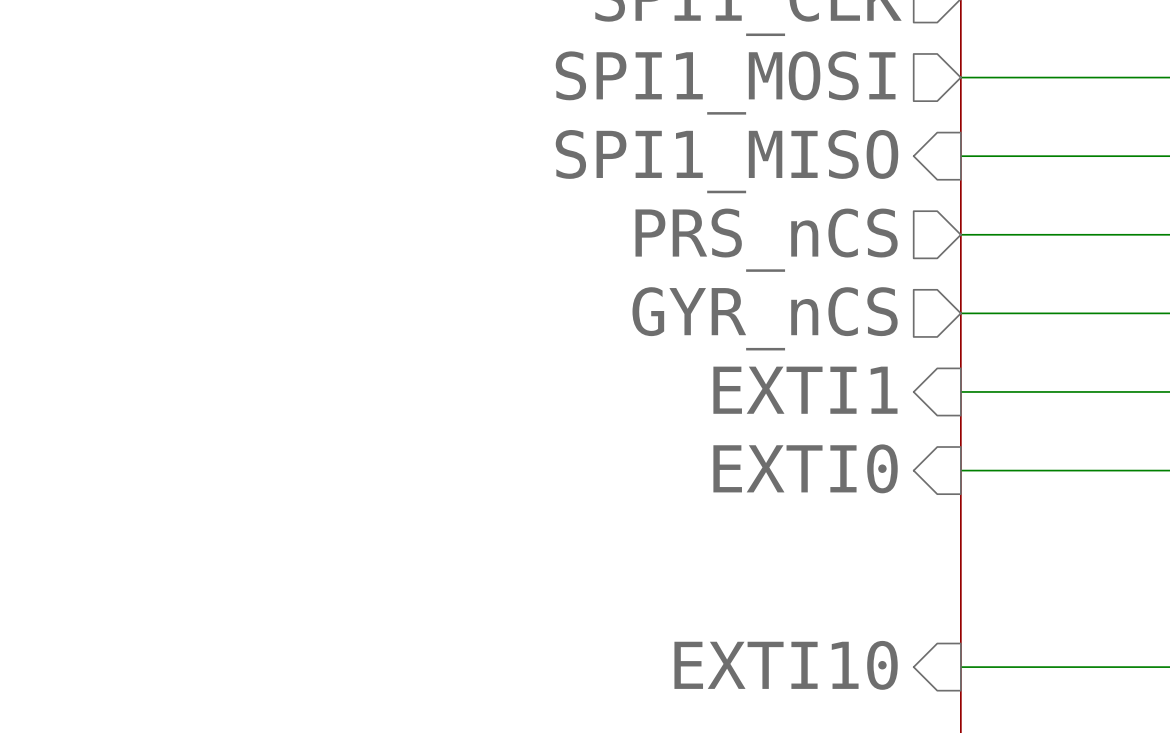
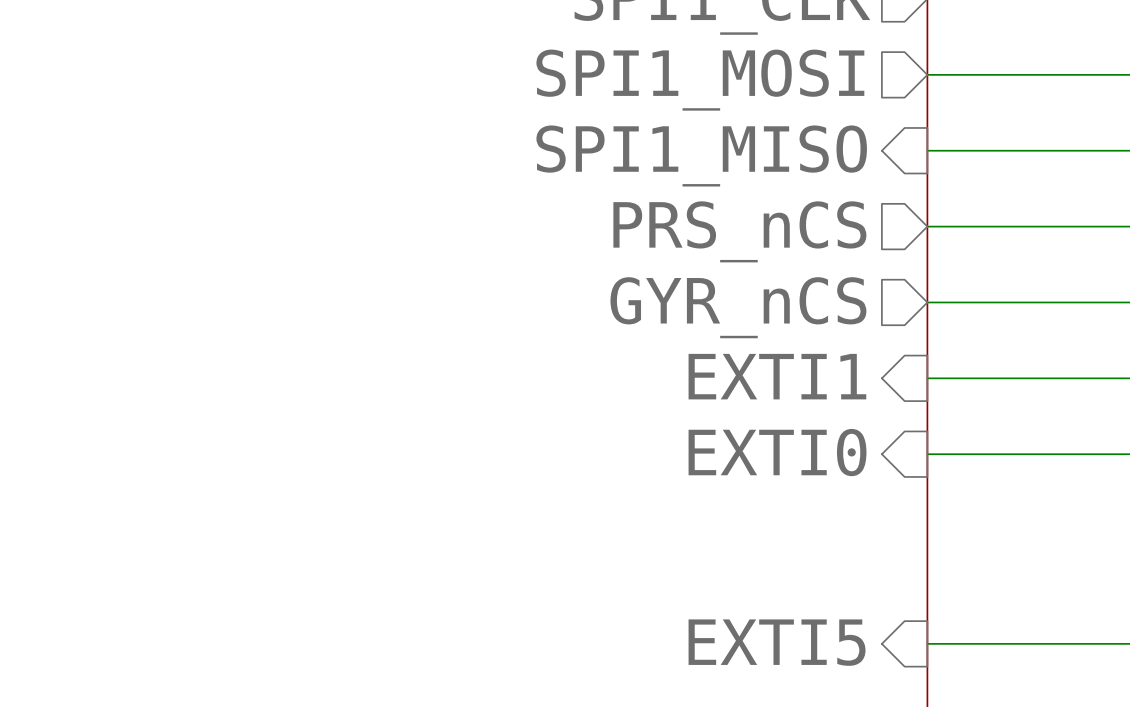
sheet pin: EXTI10 (786, 665) -> EXTI5 (777, 642)

